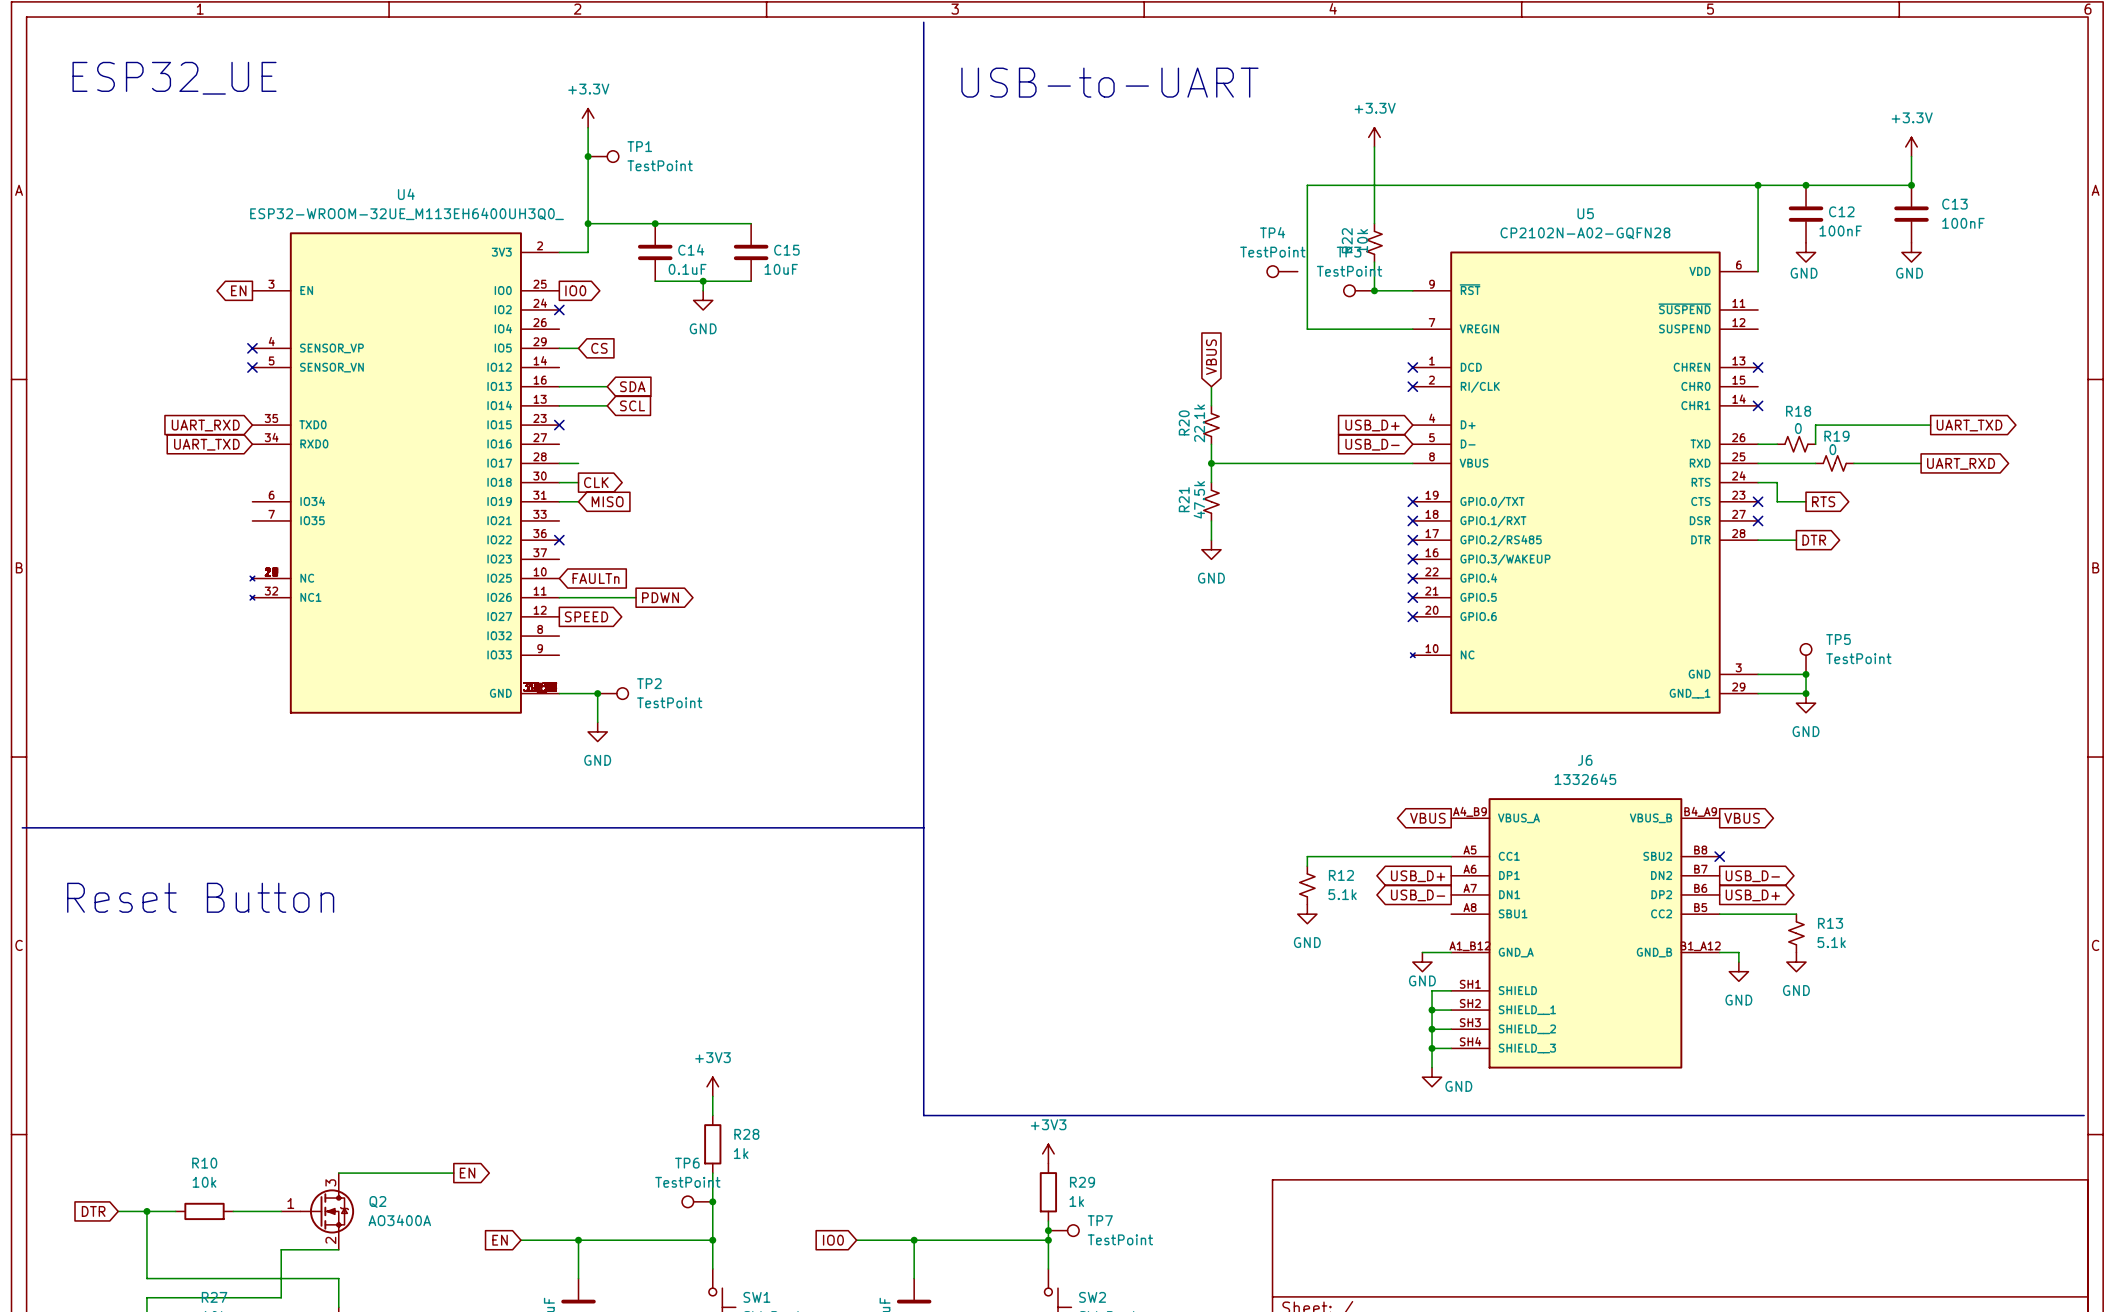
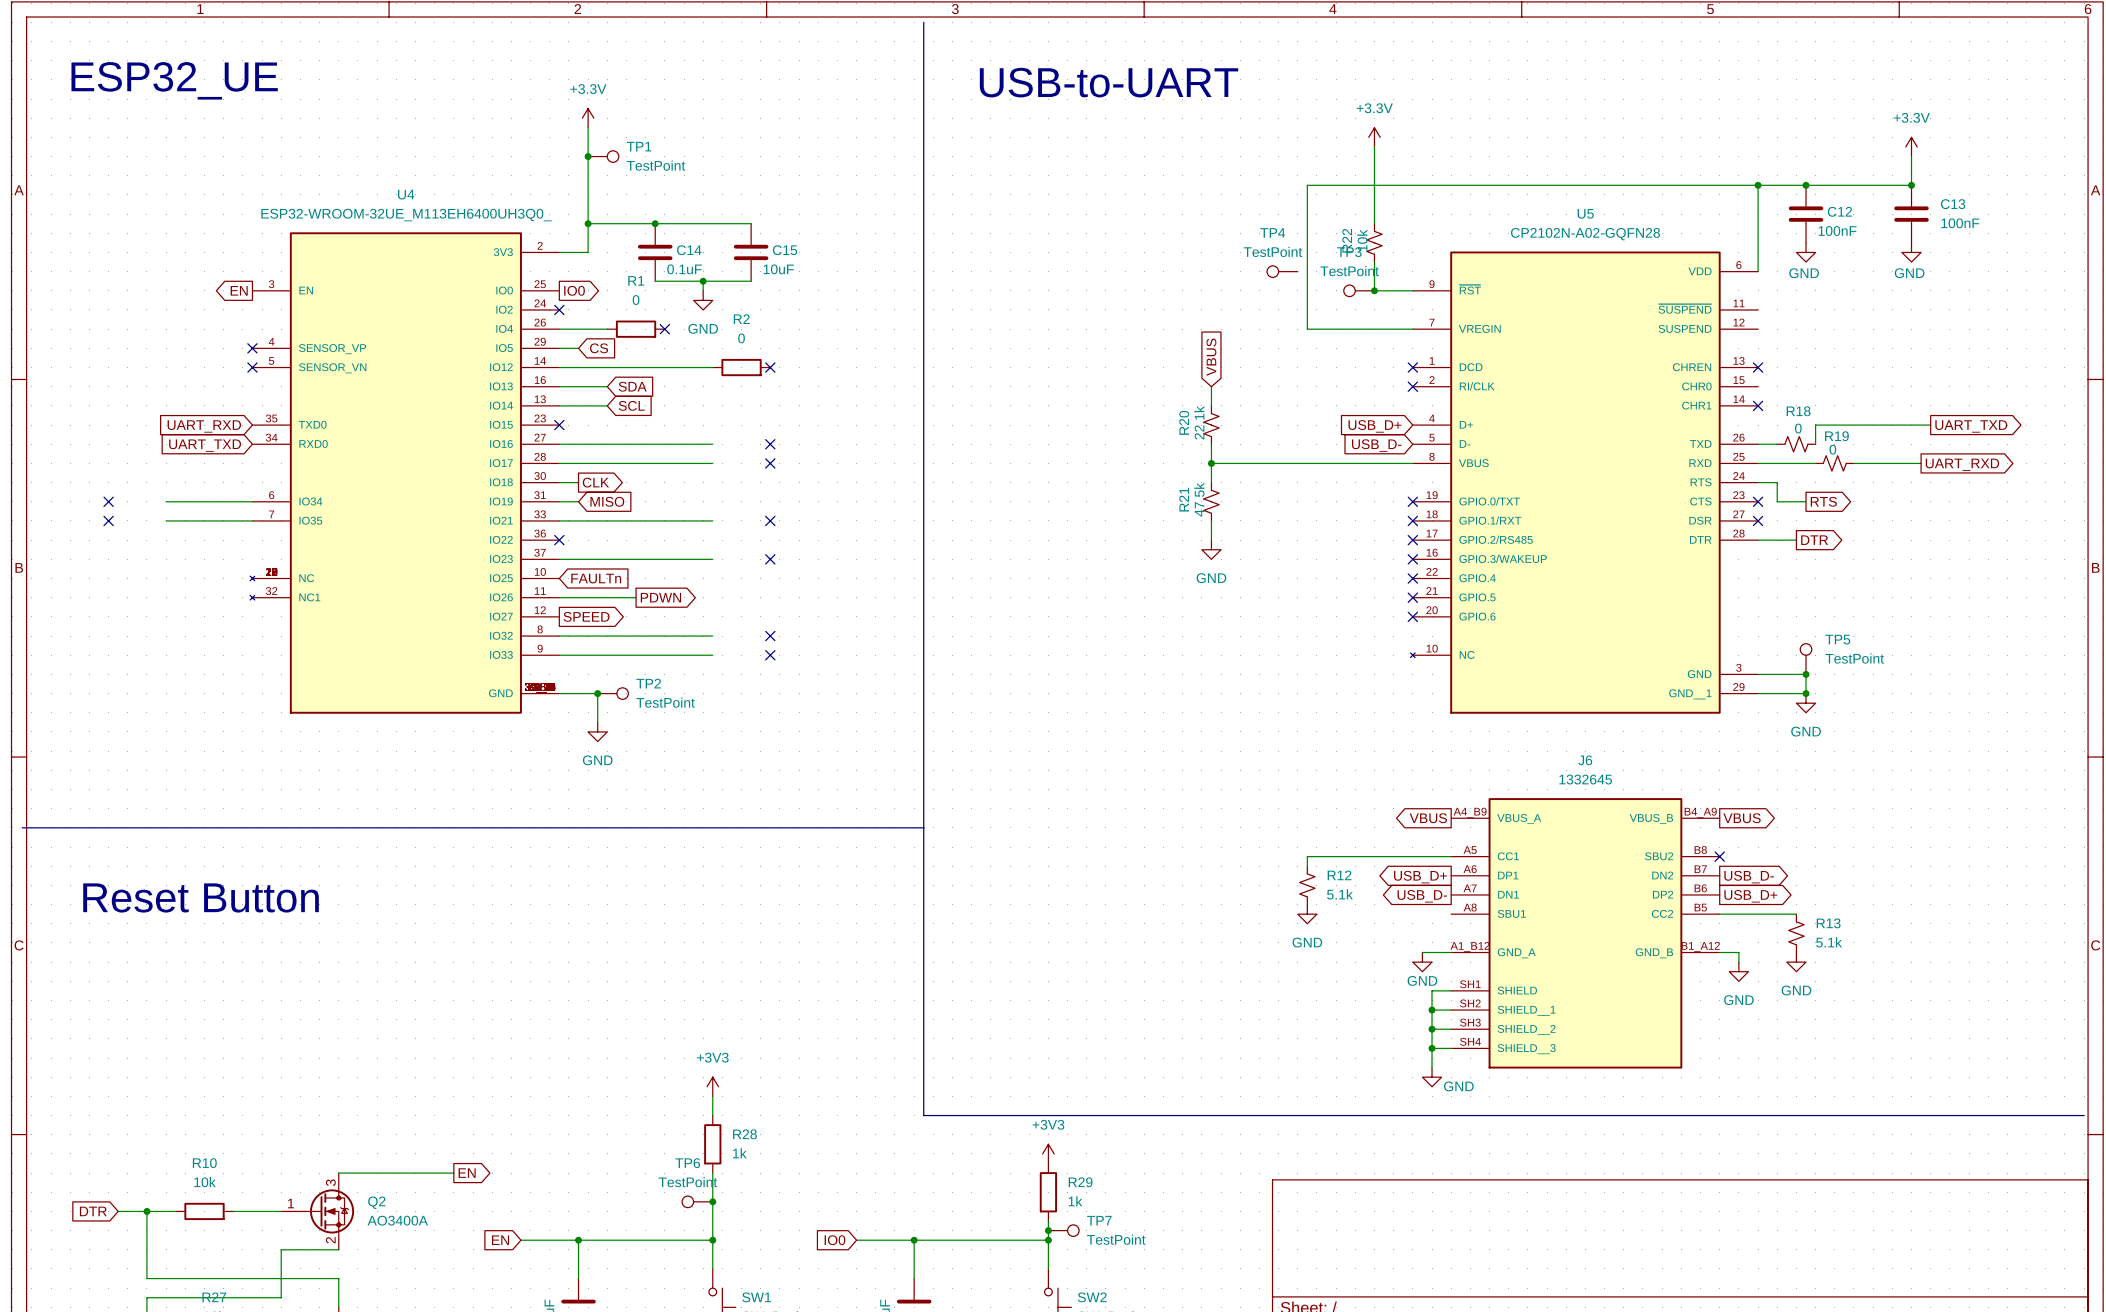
wire: none -> (559, 329) (607, 329)
R1: none -> 0 (636, 329)
no-connect mark: none -> (664, 329)
wire: none -> (559, 367) (712, 367)
R2: none -> 0 (741, 367)
no-connect mark: none -> (770, 367)
wire: none -> (559, 444) (712, 444)
no-connect mark: none -> (770, 444)
wire: none -> (578, 463) (712, 463)
no-connect mark: none -> (770, 463)
no-connect mark: none -> (108, 501)
wire: none -> (166, 501) (252, 501)
no-connect mark: none -> (108, 520)
wire: none -> (166, 520) (252, 520)
wire: none -> (559, 520) (712, 520)
no-connect mark: none -> (770, 520)
wire: none -> (559, 559) (712, 559)
no-connect mark: none -> (770, 559)
wire: none -> (559, 636) (712, 636)
no-connect mark: none -> (770, 636)
wire: none -> (559, 655) (712, 655)
no-connect mark: none -> (770, 655)

